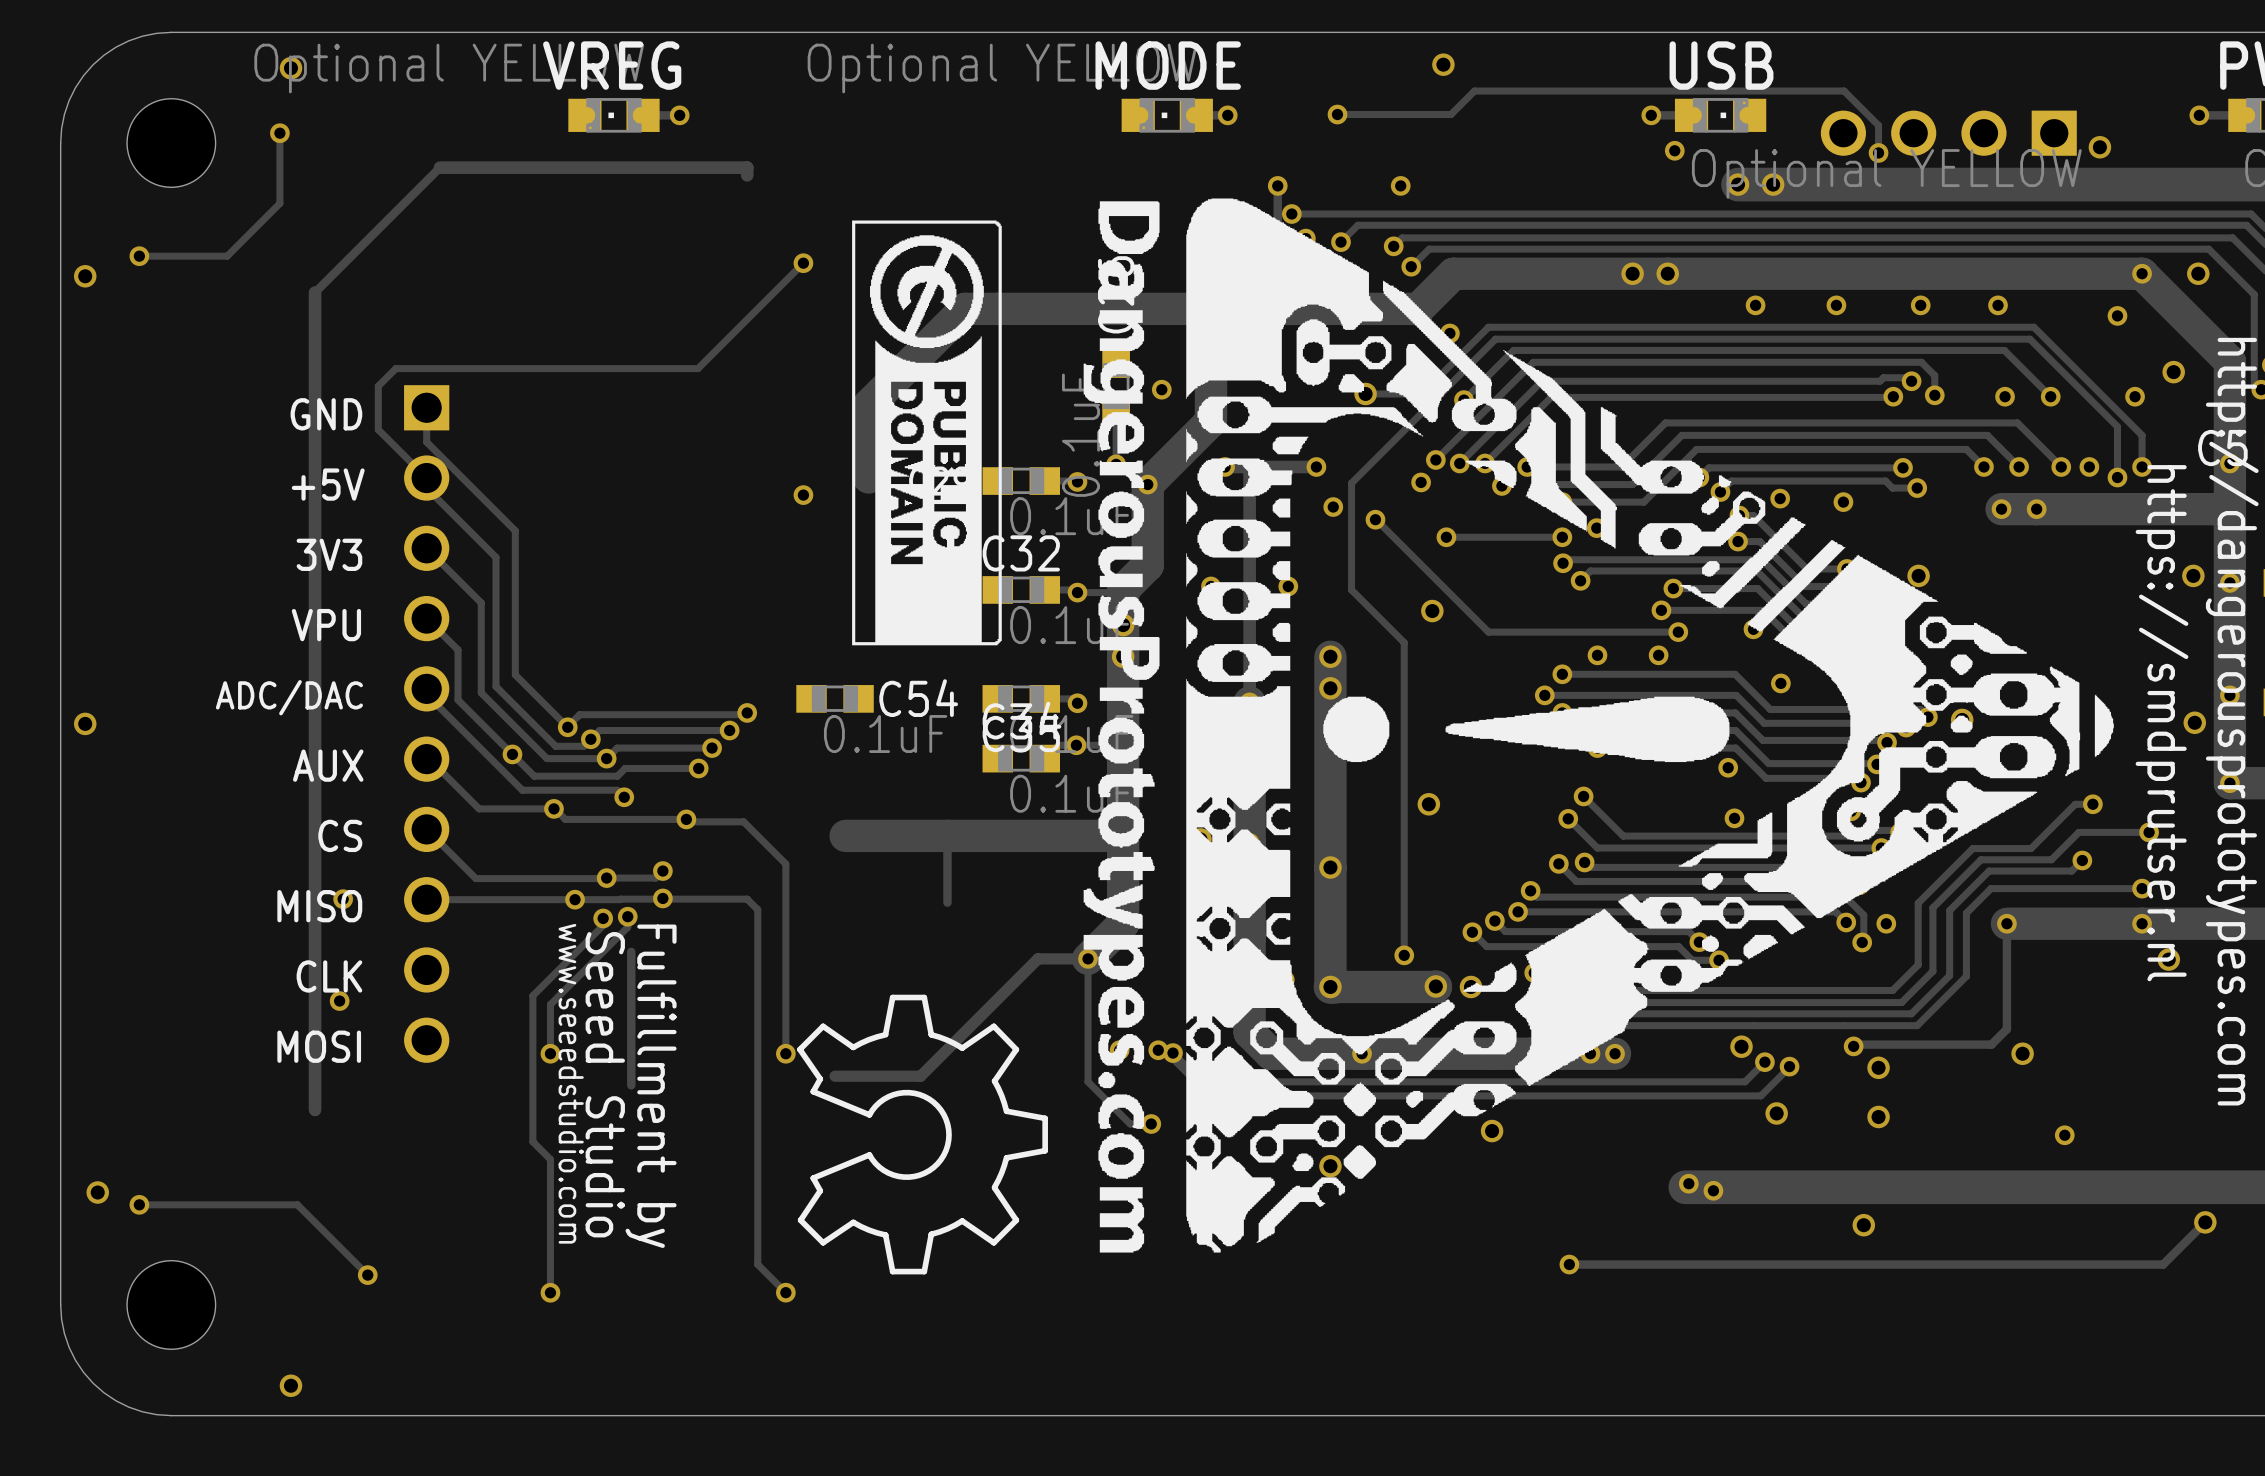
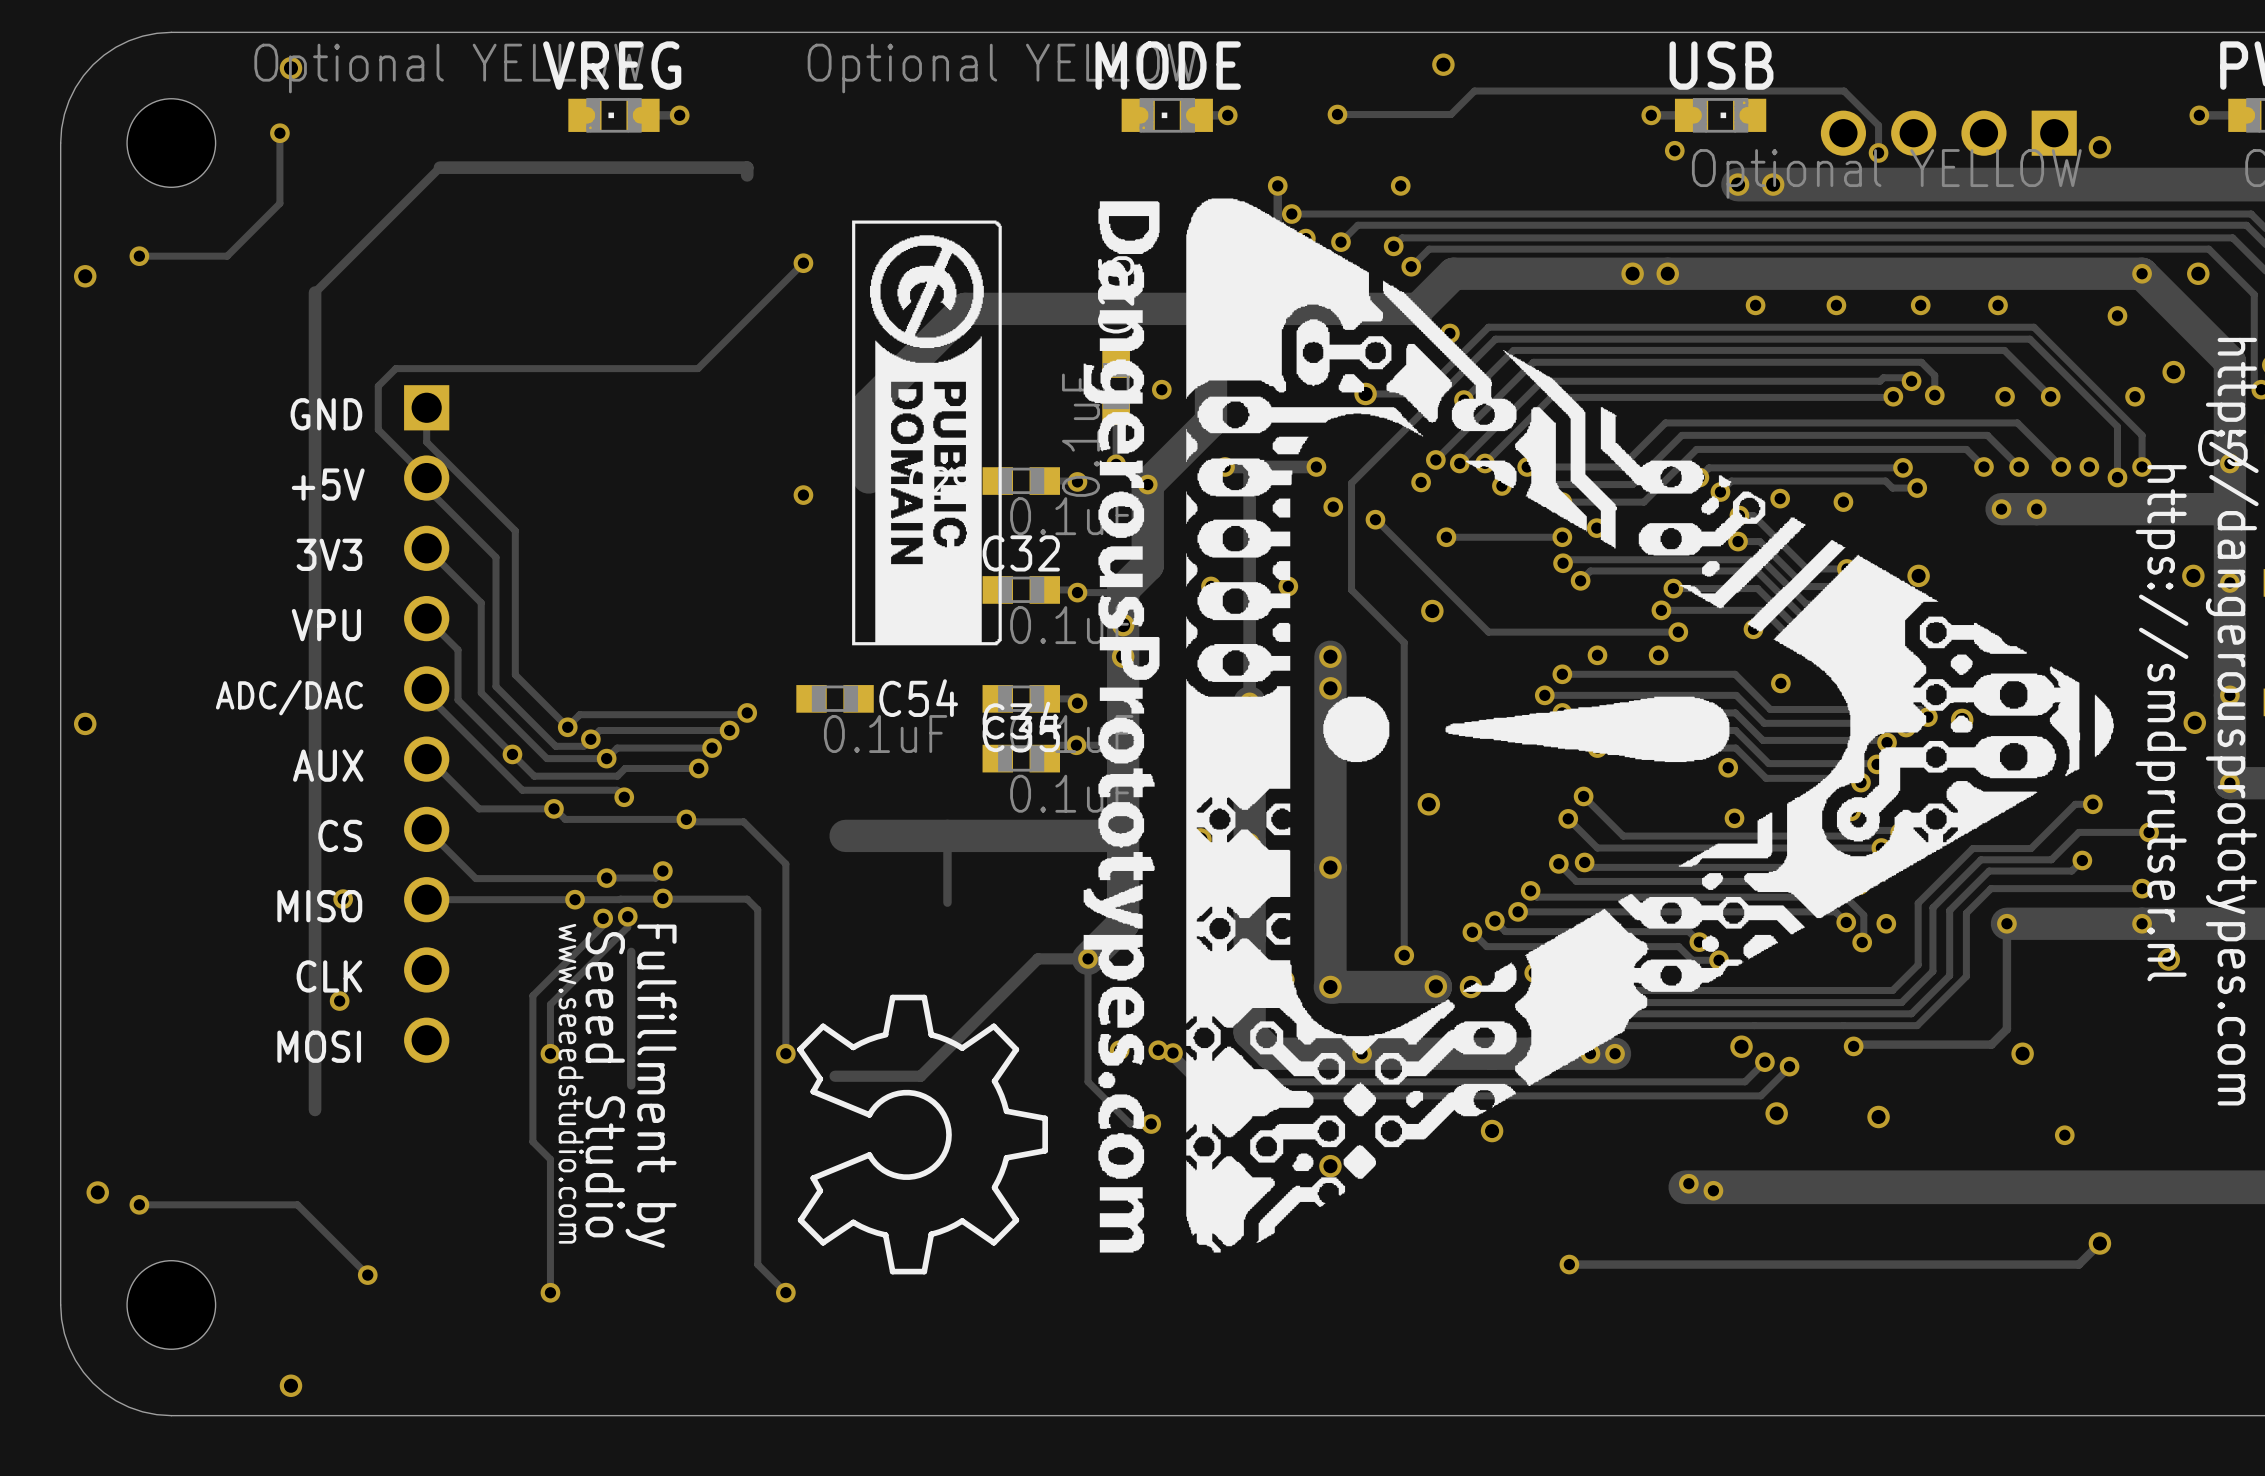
via: (1878, 1067) -> none
track: (2205, 1222) (2163, 1264) (2078, 1264) -> (2099, 1243) (2078, 1264)
via position: (2205, 1222) -> (2099, 1243)
via: (1863, 1225) -> none

